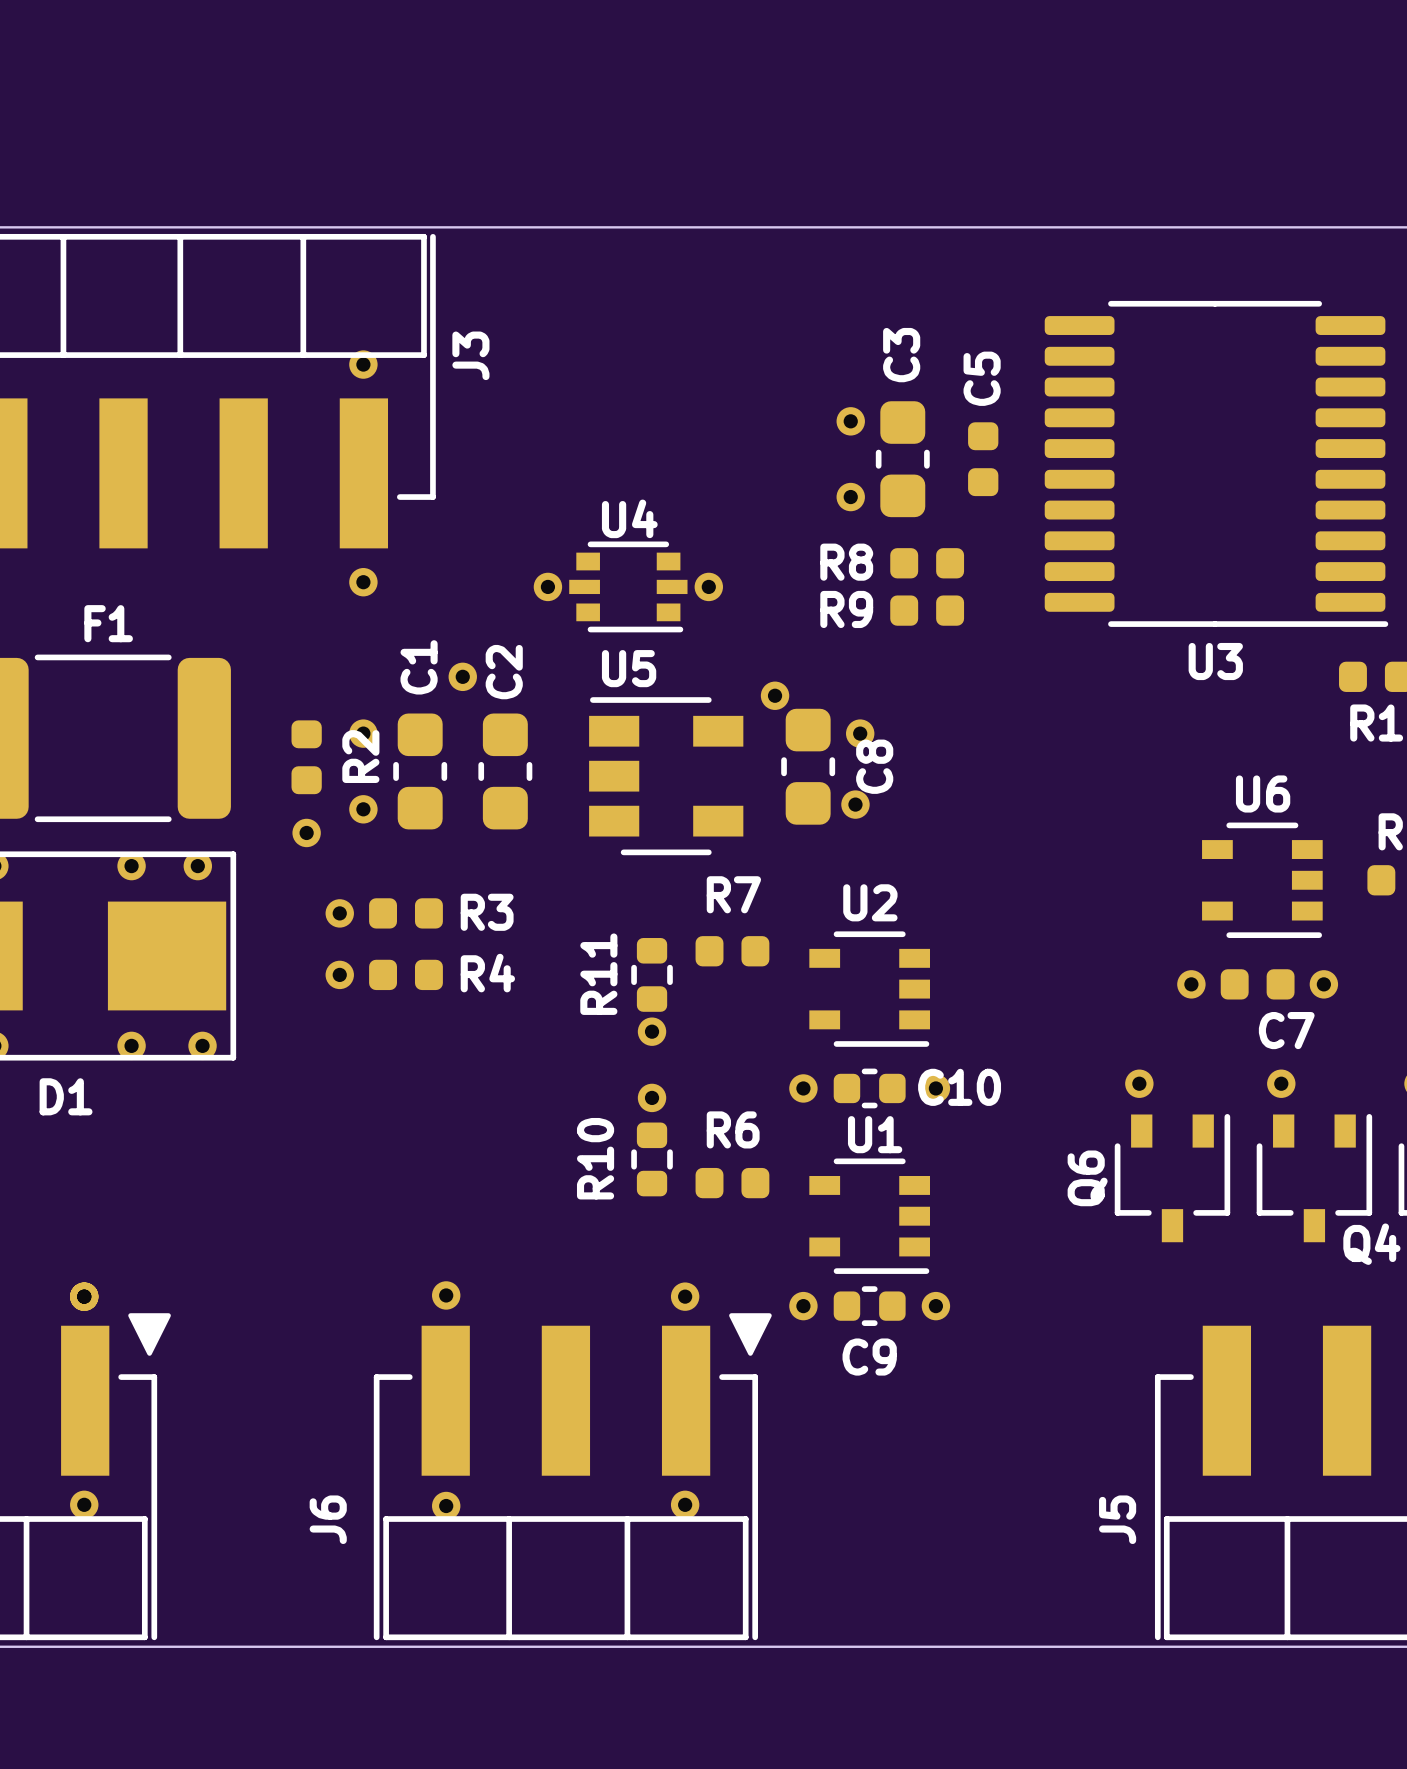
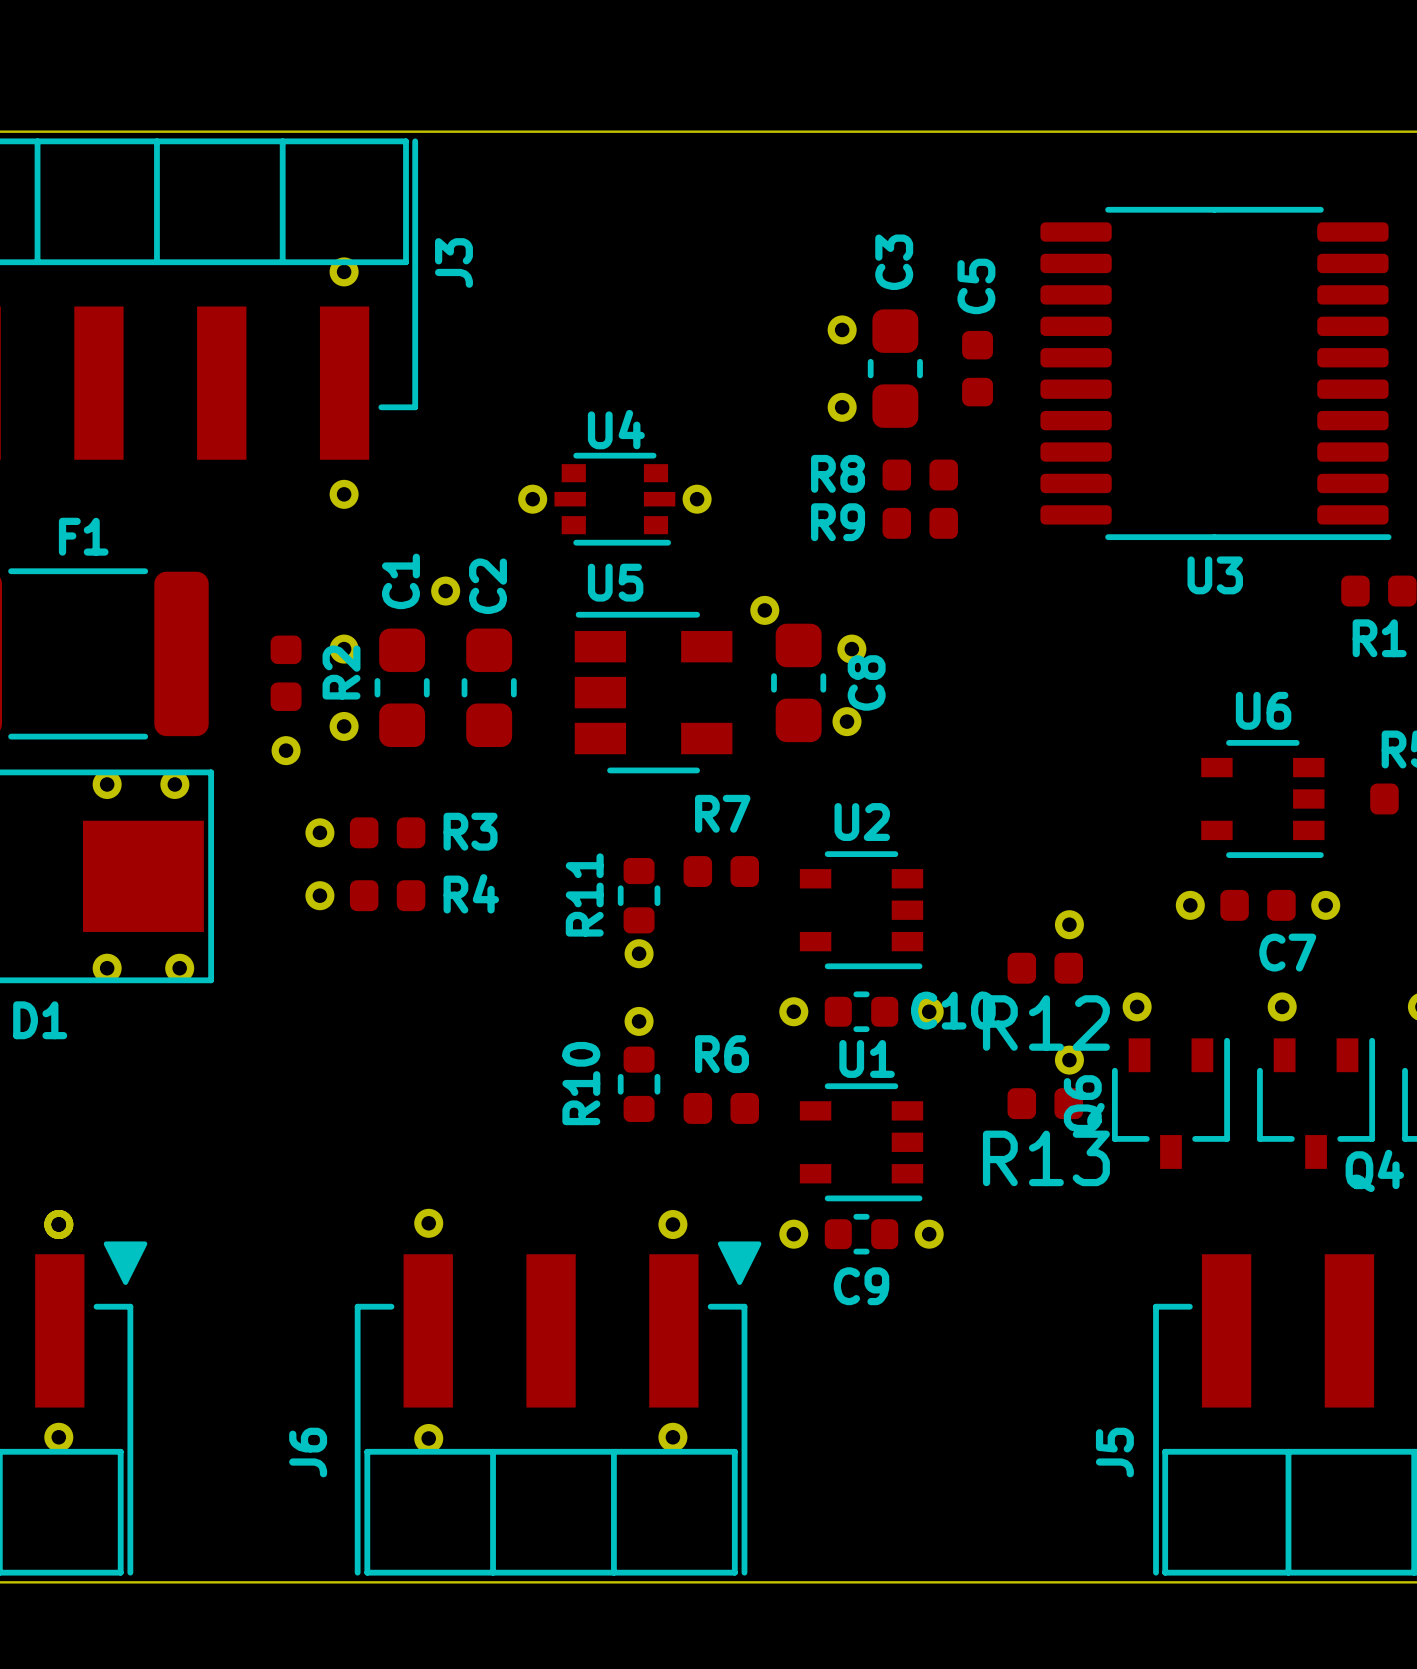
part: none -> (1069, 924)
R12: none -> (1045, 968)
part: none -> (1069, 1060)
R13: none -> (1045, 1103)

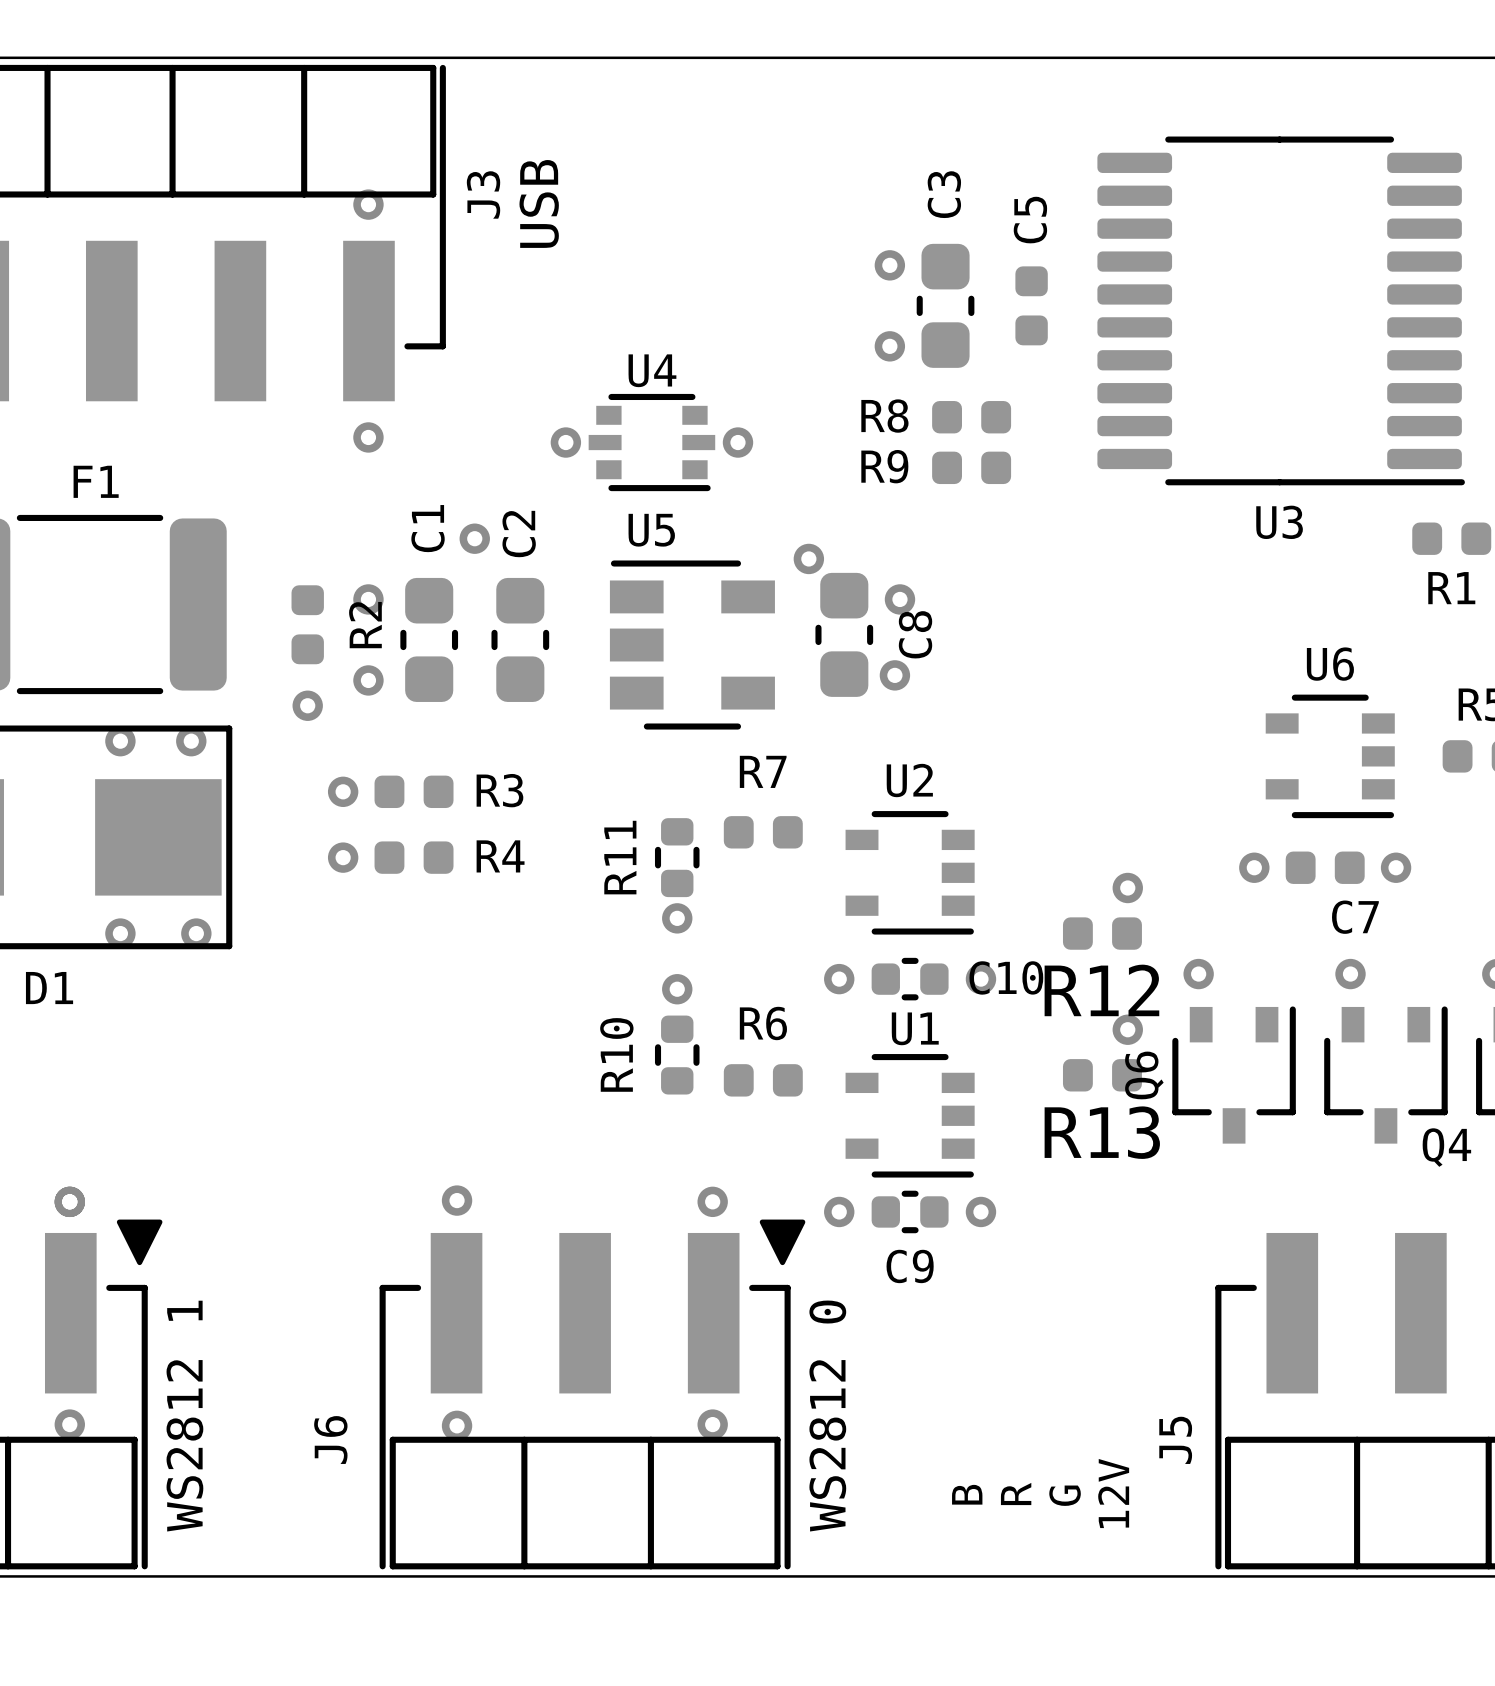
text: none -> USB (539, 203)
text: none -> WS2812 1 (184, 1416)
text: none -> WS2812 0 (827, 1416)
text: none -> 12V (1113, 1493)
text: none -> B (967, 1494)
text: none -> R (1016, 1493)
text: none -> G (1065, 1495)

